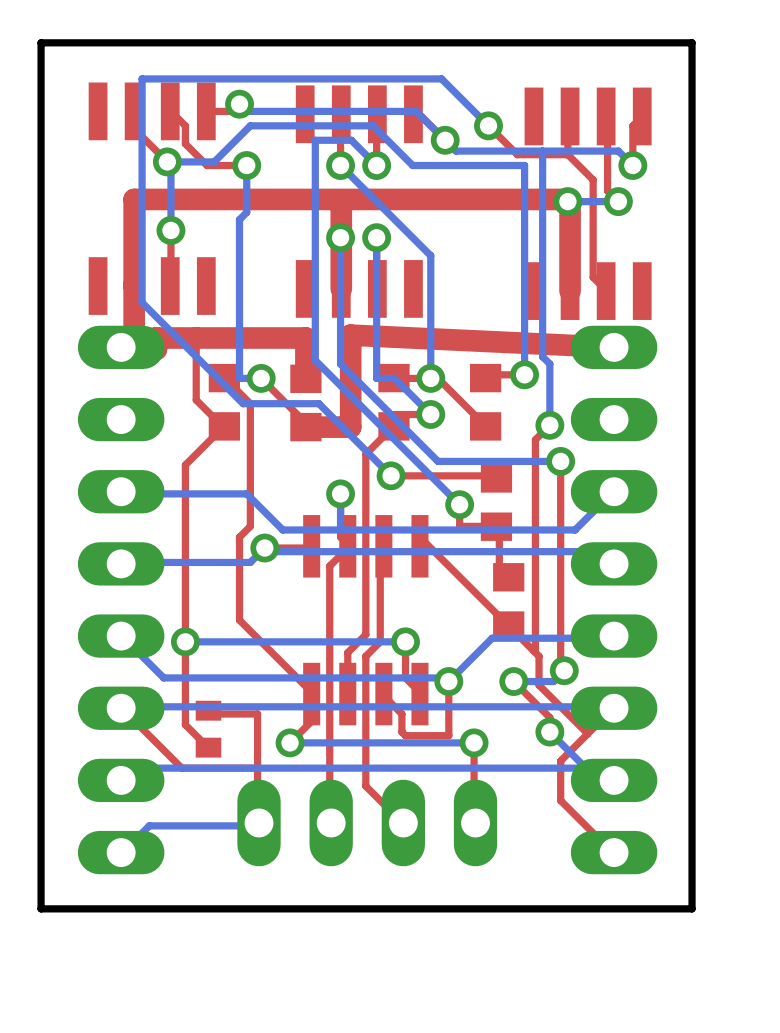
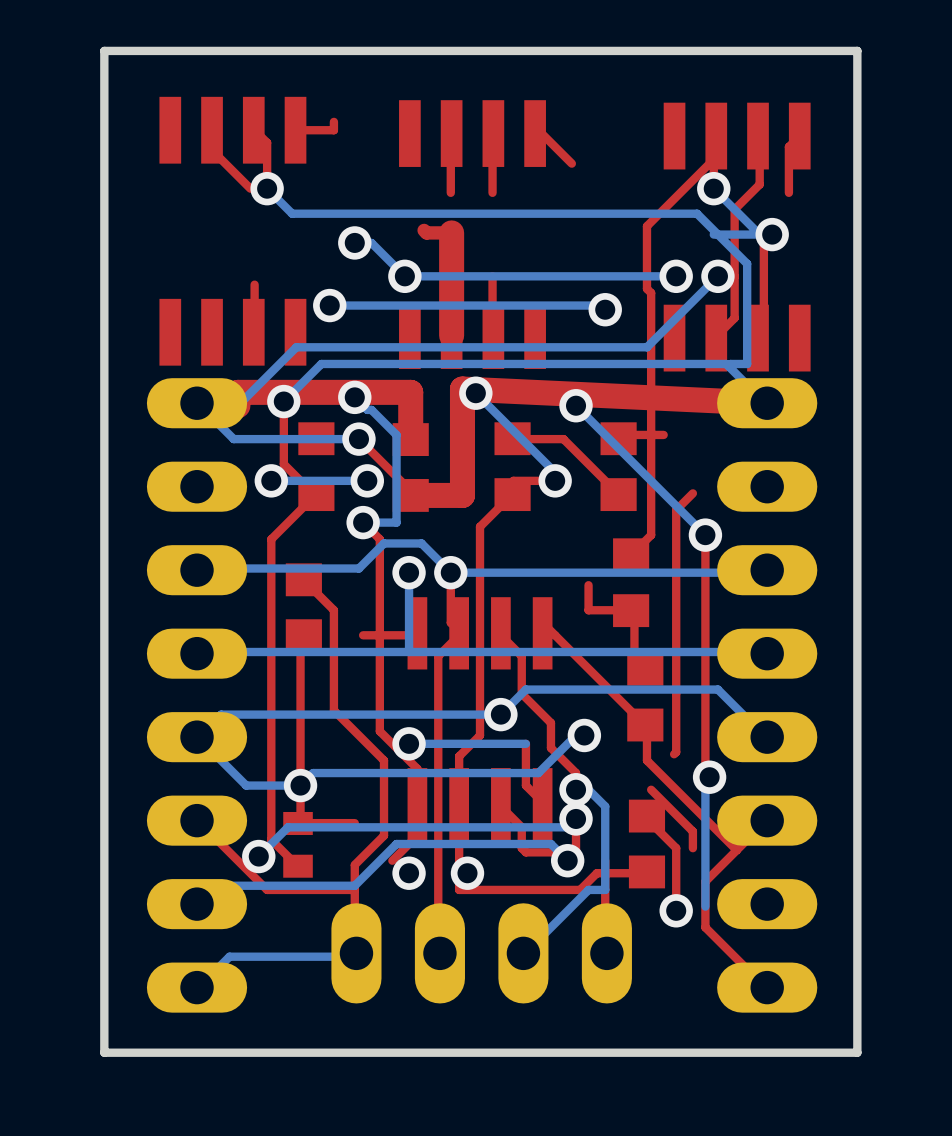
bottom track: (239, 104) (246, 111) (416, 111) (456, 151) (618, 151) (632, 165) -> none
via: (239, 104) -> none
top track: (181, 122) (185, 125) (185, 143) (207, 165) (246, 165) -> (267, 142) (267, 188)
top track: (488, 125) (517, 154) (567, 154) (593, 179) (593, 277) (606, 291) -> none
bottom track: (488, 125) (441, 78) (142, 78) (142, 302) (243, 403) (318, 403) (391, 475) -> none
via: (488, 125) -> none
via: (445, 140) -> none
bottom track: (542, 151) (542, 356) (549, 363) (549, 425) -> none
top track: (607, 158) (607, 190) (618, 201) -> (759, 184) (734, 209) (734, 318) (721, 333)
bottom track: (167, 161) (214, 161) (250, 125) (373, 125) (412, 165) (524, 165) (524, 374) -> none
via position: (167, 161) -> (267, 188)
bottom track: (170, 161) (170, 230) -> (409, 572) (409, 652)
bottom track: none -> (267, 188) (292, 213) (697, 213) (747, 263) (747, 363) (730, 363) (728, 366)
bottom track: none -> (713, 188) (763, 238)
via: none -> (713, 188)
bottom track: (246, 165) (246, 212) (239, 219) (239, 378) -> (717, 276) (646, 347) (296, 347) (221, 422) (197, 403) (233, 439) (333, 439)
via: (246, 165) -> none
bottom track: (340, 165) (430, 255) (430, 378) -> none
via: (340, 165) -> none
bottom track: (376, 165) (351, 140) (315, 140) (315, 360) (459, 504) -> none
via: (376, 165) -> none
via: (632, 165) -> none
via: (567, 201) -> none
top track: none -> (763, 238) (763, 333)
bottom track: none -> (354, 242) (371, 242) (404, 276) (676, 276)
via: none -> (354, 242)
via: (170, 230) -> none
via: none -> (404, 276)
bottom track: (340, 237) (340, 363) (437, 461) (560, 461) -> (576, 405) (705, 535)
via: (340, 237) -> none
bottom track: (376, 237) (376, 378) (394, 378) (430, 414) -> none
via: (376, 237) -> none
via: none -> (676, 276)
via: none -> (717, 276)
bottom track: none -> (329, 305) (601, 305) (605, 309)
via: none -> (329, 305)
via: none -> (605, 309)
top track: (570, 291) (570, 199) (134, 199) (134, 347) (121, 347) (142, 338) (156, 338) -> none
bottom track: none -> (475, 393) (555, 472)
via: none -> (475, 393)
bottom track: none -> (354, 397) (367, 409) (371, 409) (396, 434) (396, 522) (363, 522)
via: none -> (354, 397)
bottom track: none -> (283, 401) (321, 363) (726, 363) (767, 403)
via: none -> (283, 401)
via: (524, 374) -> none
top track: (224, 378) (250, 403) (250, 526) (239, 537) -> (303, 579) (333, 610) (333, 622)
via position: (430, 378) -> (576, 405)
via: none -> (271, 480)
bottom track: none -> (367, 480) (271, 480)
via: none -> (367, 480)
via: (549, 425) -> none
top track: none -> (363, 522) (379, 539) (379, 731) (417, 768) (417, 802)
via: none -> (363, 522)
top track: (391, 475) (495, 475) (496, 478) -> (721, 131) (717, 134) (717, 155) (646, 226) (646, 288) (651, 293) (651, 535) (631, 554)
via: (391, 475) -> none
bottom track: (121, 491) (124, 493) (246, 493) (282, 529) (575, 529) (611, 493) -> (197, 570) (200, 568) (358, 568) (384, 543) (421, 543) (450, 572) (763, 572)
via: none -> (409, 572)
bottom track: (340, 493) (340, 529) -> none
via: (459, 504) -> none
part: none -> (303, 607)
top track: none -> (303, 635) (300, 639) (300, 818) (298, 823) (354, 823)
via: (264, 548) -> none
top track: (383, 548) (380, 551) (380, 641) (365, 656) (365, 786) (403, 822) -> (500, 635) (521, 656) (521, 693) (550, 722) (550, 748) (576, 773) (576, 777)
bottom track: (611, 562) (600, 551) (264, 551) (264, 548) (250, 562) -> (763, 652) (346, 652)
top track: (239, 612) (239, 620) (311, 692) -> (333, 710) (384, 760) (384, 835) (354, 864)
via: none -> (500, 714)
top track: (510, 627) (539, 656) (539, 685) -> (646, 727) (646, 760) (680, 793)
bottom track: none -> (584, 735) (576, 735) (538, 773) (313, 773) (300, 785)
via: none -> (584, 735)
bottom track: (614, 636) (611, 638) (492, 638) (448, 681) (448, 677) (210, 677) -> (767, 737) (717, 689) (525, 689) (500, 714) (221, 714) (197, 737)
via position: (185, 641) -> (300, 785)
bottom track: (304, 641) (185, 641) -> none
via: none -> (409, 743)
via: (405, 641) -> none
bottom track: none -> (705, 777) (705, 906)
bottom track: (564, 670) (553, 681) (513, 681) -> none
via: (513, 681) -> none
top track: none -> (459, 804) (459, 889) (580, 889) (596, 873) (646, 871)
bottom track: (124, 706) (614, 708) -> none
bottom track: none -> (576, 818) (567, 827) (288, 827) (258, 856)
via: none -> (576, 818)
top track: none -> (646, 818) (676, 848) (676, 910)
top track: (208, 710) (210, 714) (257, 714) (257, 746) -> none
part: none -> (646, 844)
bottom track: (549, 732) (596, 778) (614, 780) (582, 768) (474, 768) -> (576, 777) (605, 806) (605, 889)
via: (549, 732) -> none
via: none -> (258, 856)
via position: (290, 742) -> (409, 873)
via: none -> (567, 860)
bottom track: (474, 742) (290, 742) -> none
via: (474, 742) -> none
via: none -> (467, 873)
bottom track: (459, 768) (134, 768) -> (567, 860) (550, 844) (396, 844) (354, 885) (217, 885) (212, 889)
bottom track: none -> (588, 889) (523, 953)
via: none -> (676, 910)

